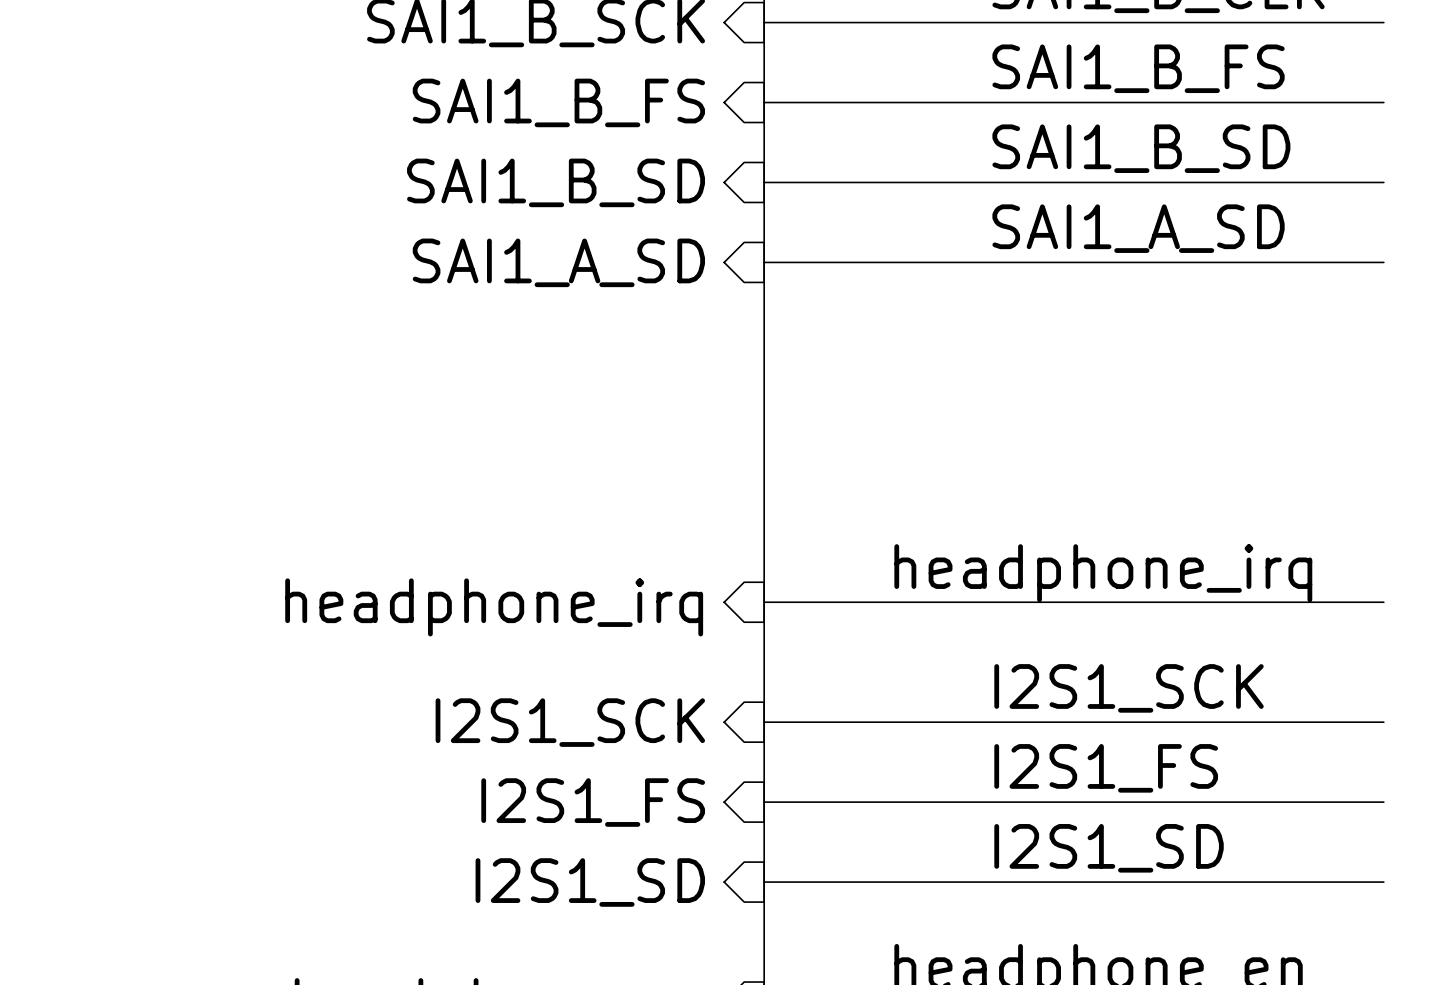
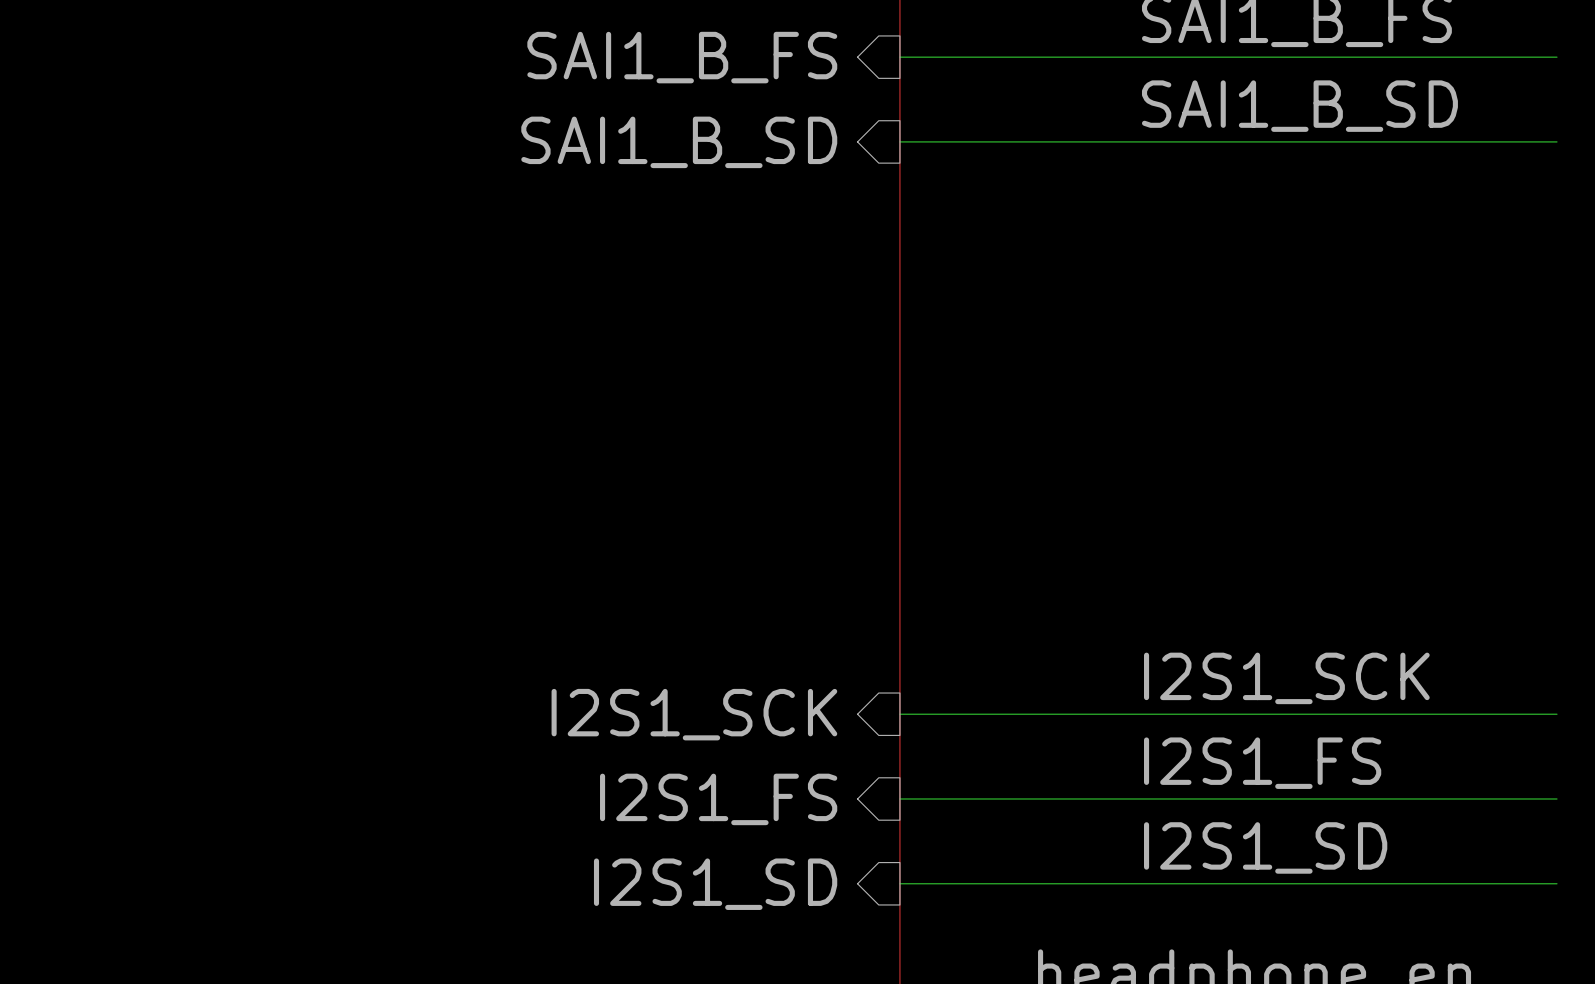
label: SAI1_A_SD (1138, 228) -> none
sheet pin: SAI1_A_SD (558, 262) -> none
wire: (764, 262) (1383, 262) -> none
label: headphone_irq (1103, 573) -> none
wire: (764, 602) (1383, 602) -> none
sheet pin: headphone_irq (494, 607) -> none

